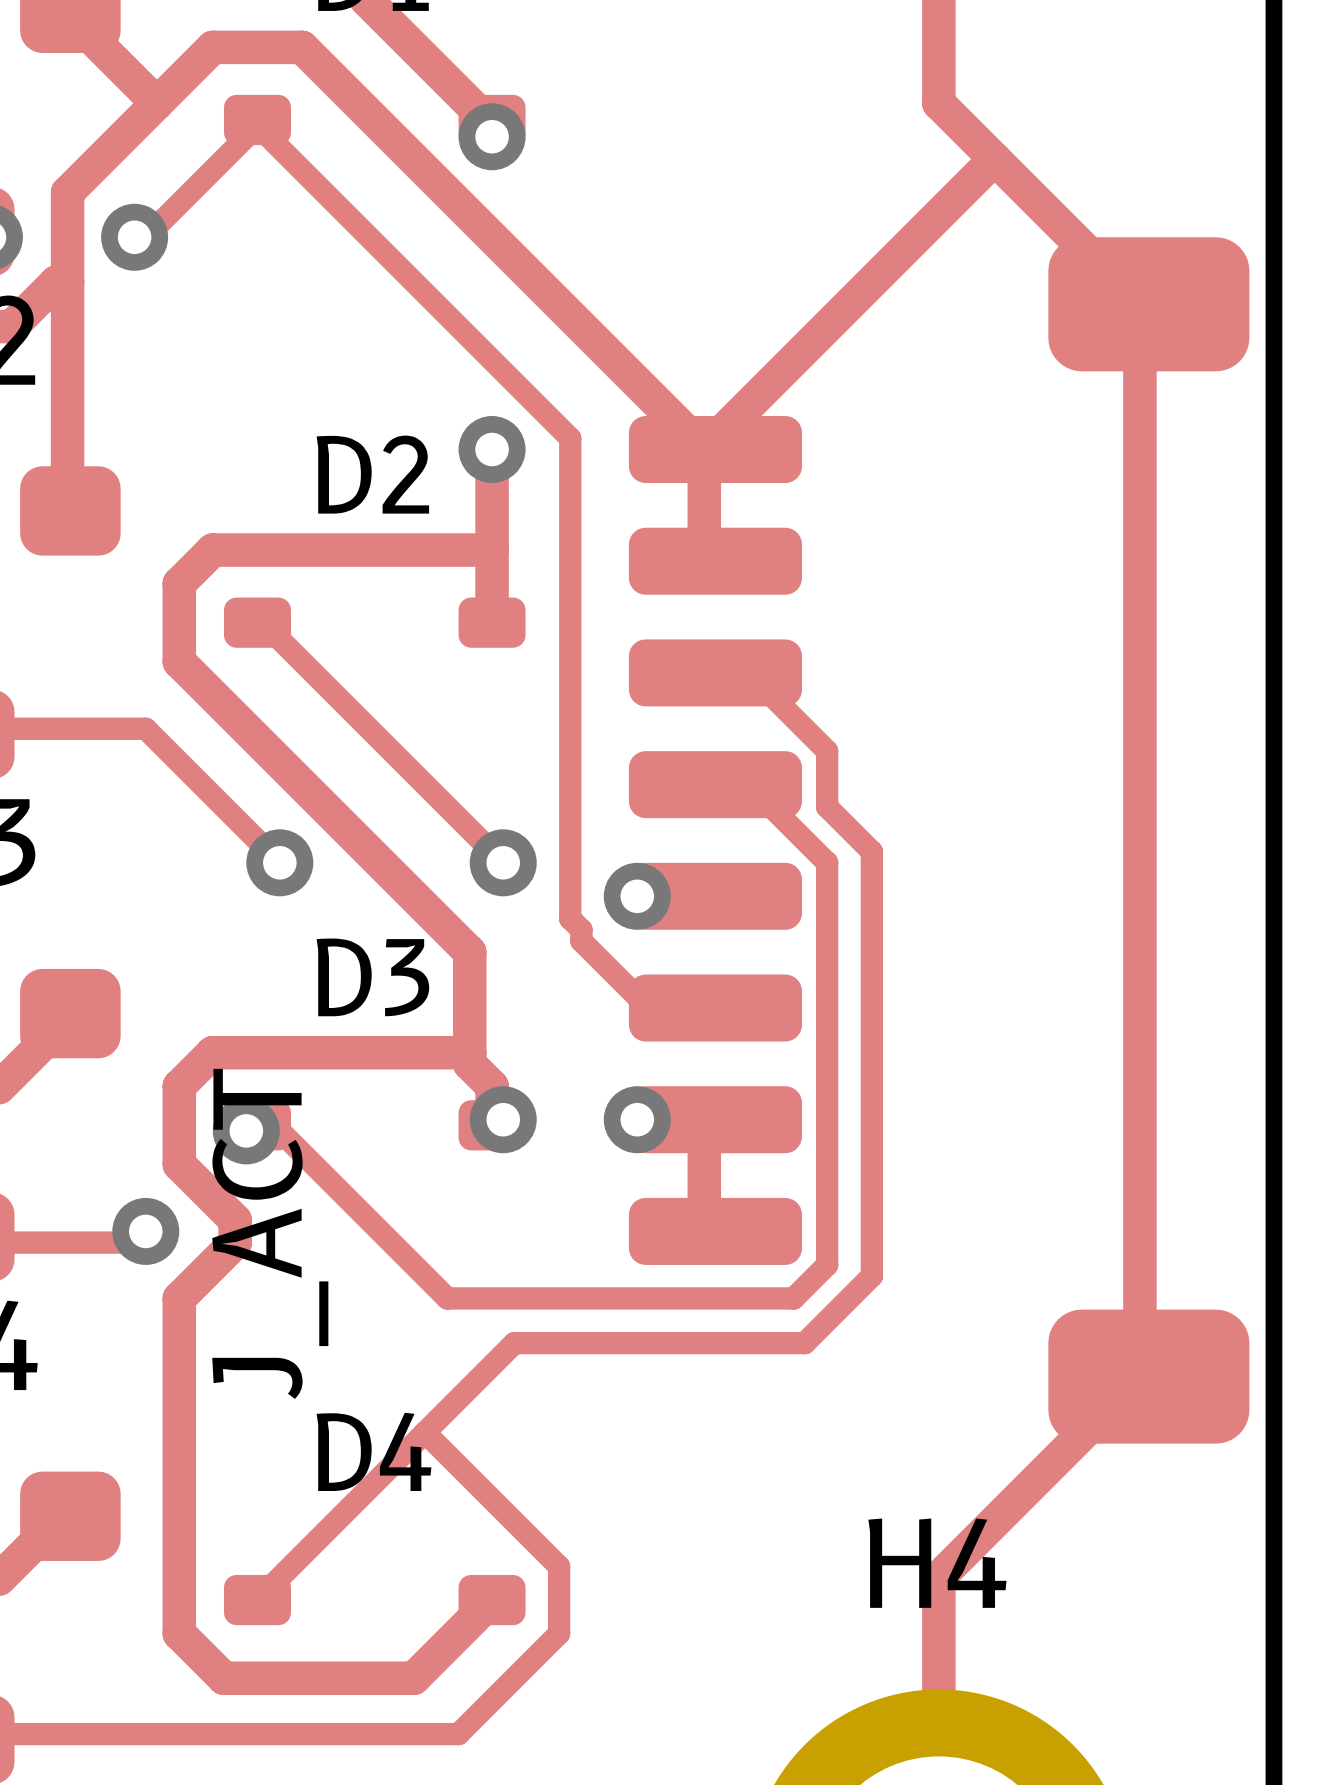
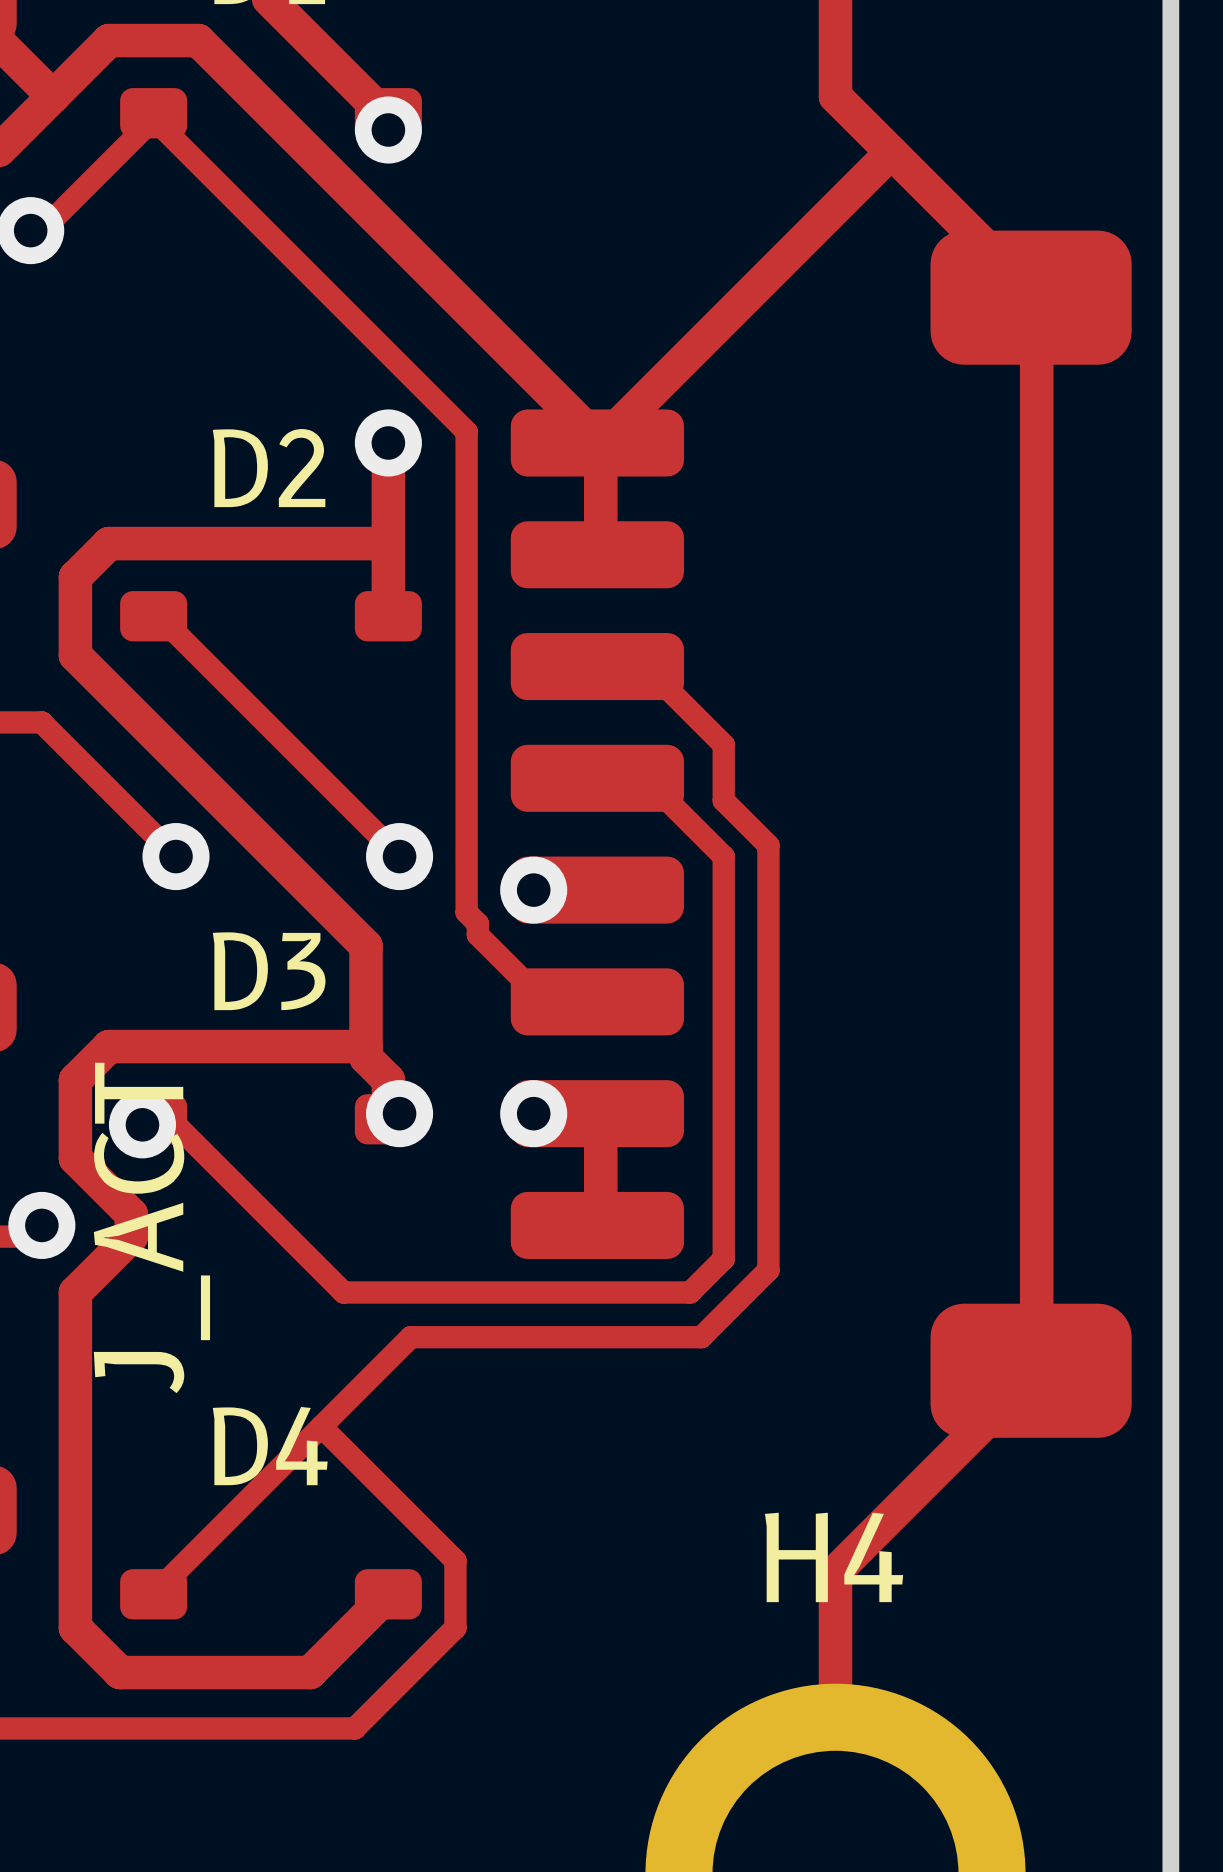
J_ACT position: (939, 840) -> (821, 834)

